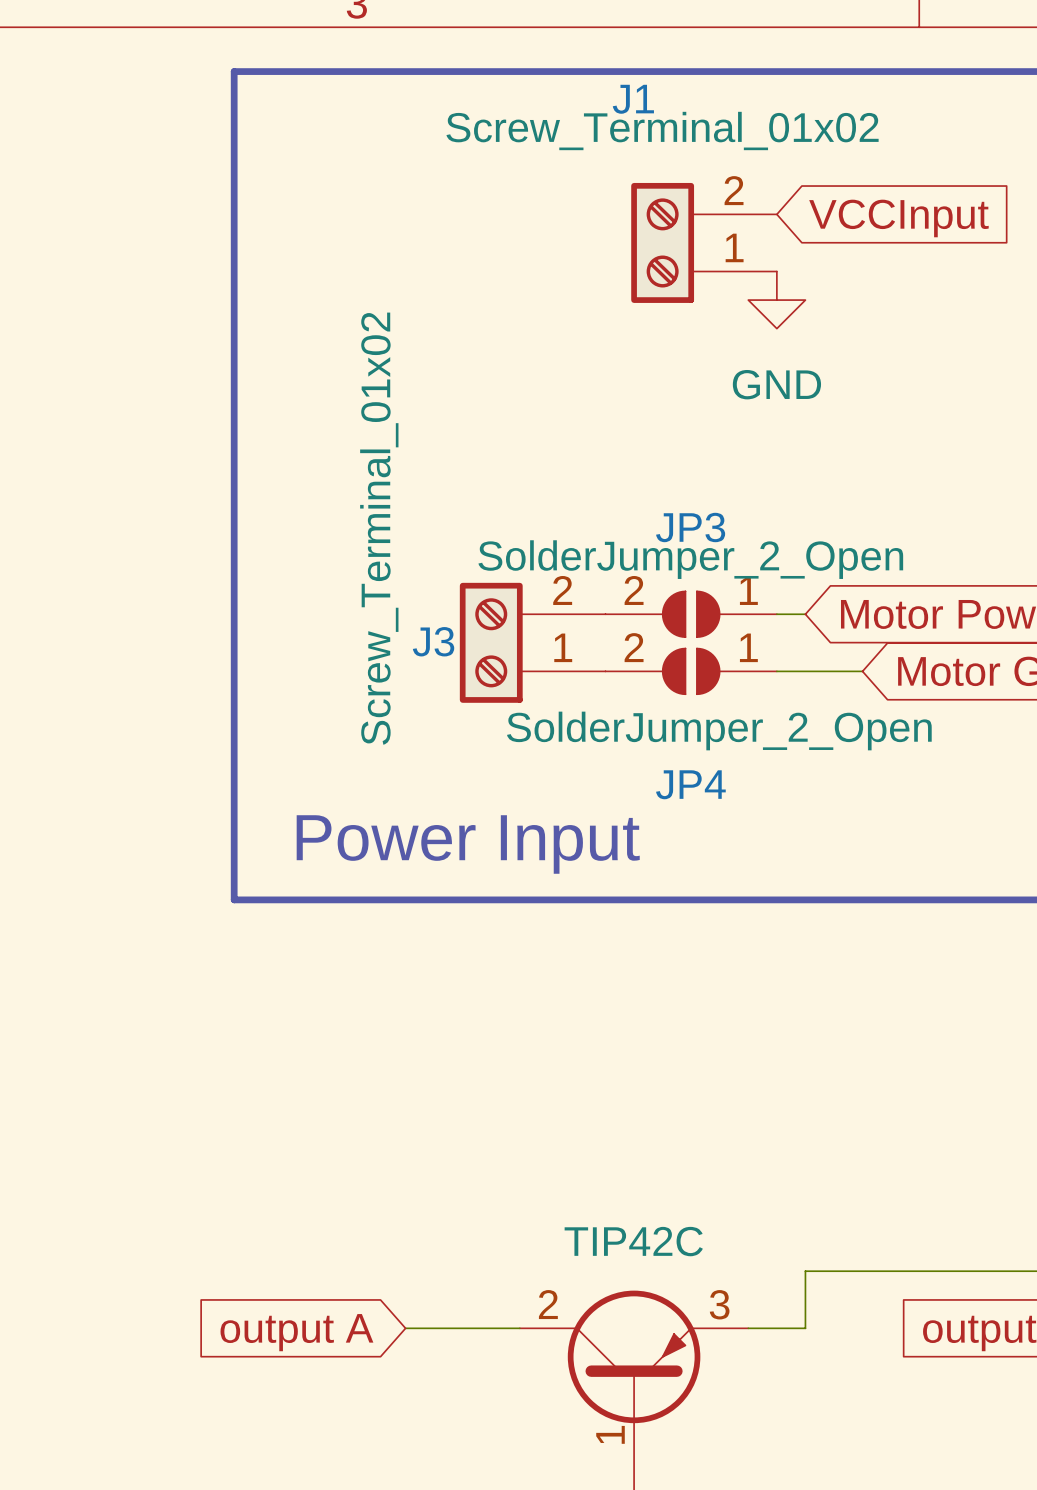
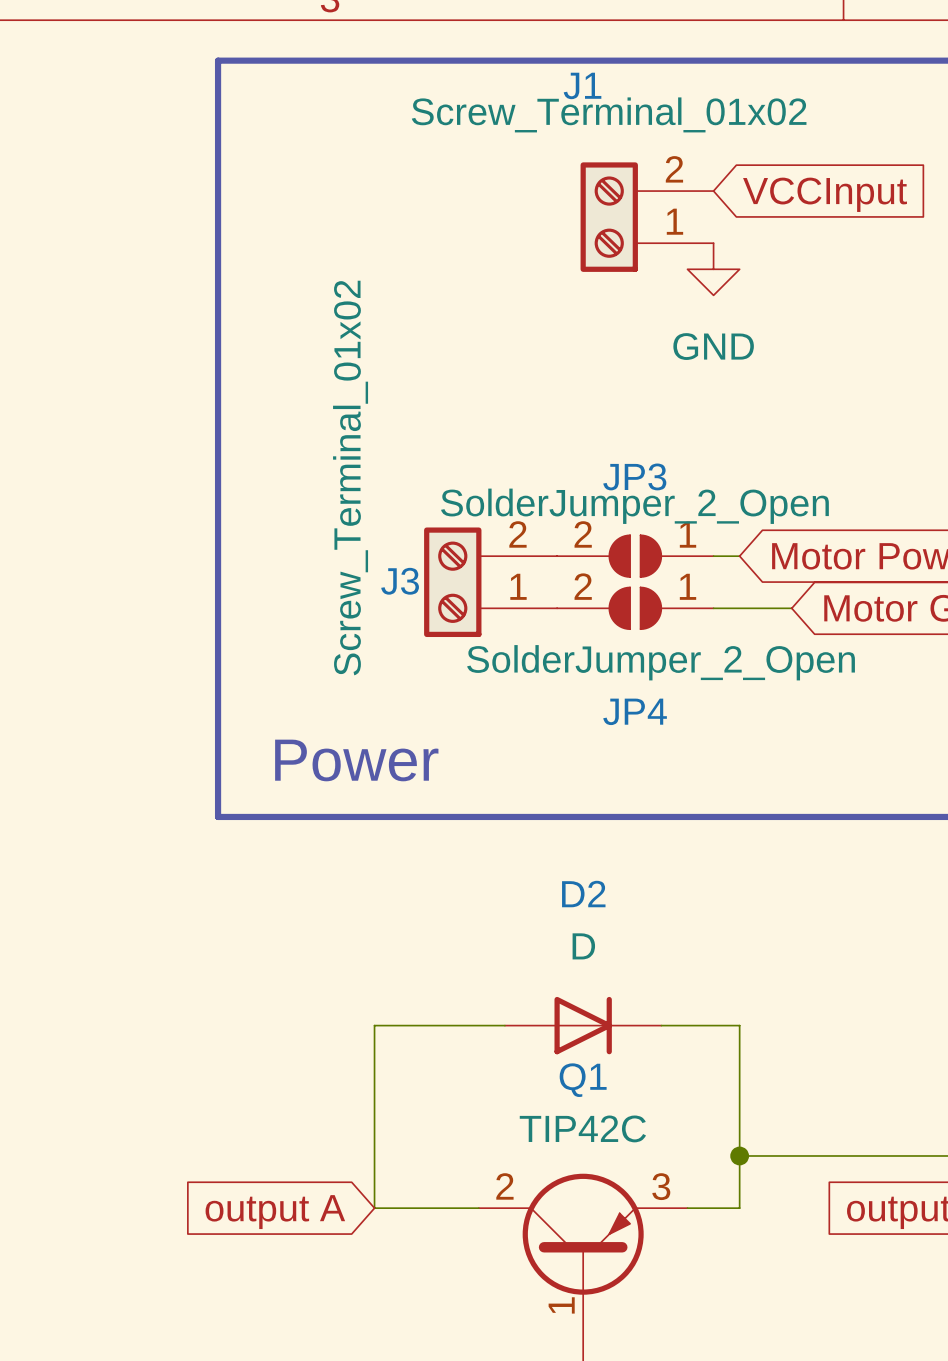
text: Power Input (468, 844) -> Power (356, 760)
wire: none -> (504, 1025) (374, 1025) (374, 1208)
D2: none -> D (583, 1025)
wire: none -> (661, 1025) (739, 1025) (739, 1155)
Q1 name: none -> Q1 (583, 1080)
junction: none -> (739, 1155)

